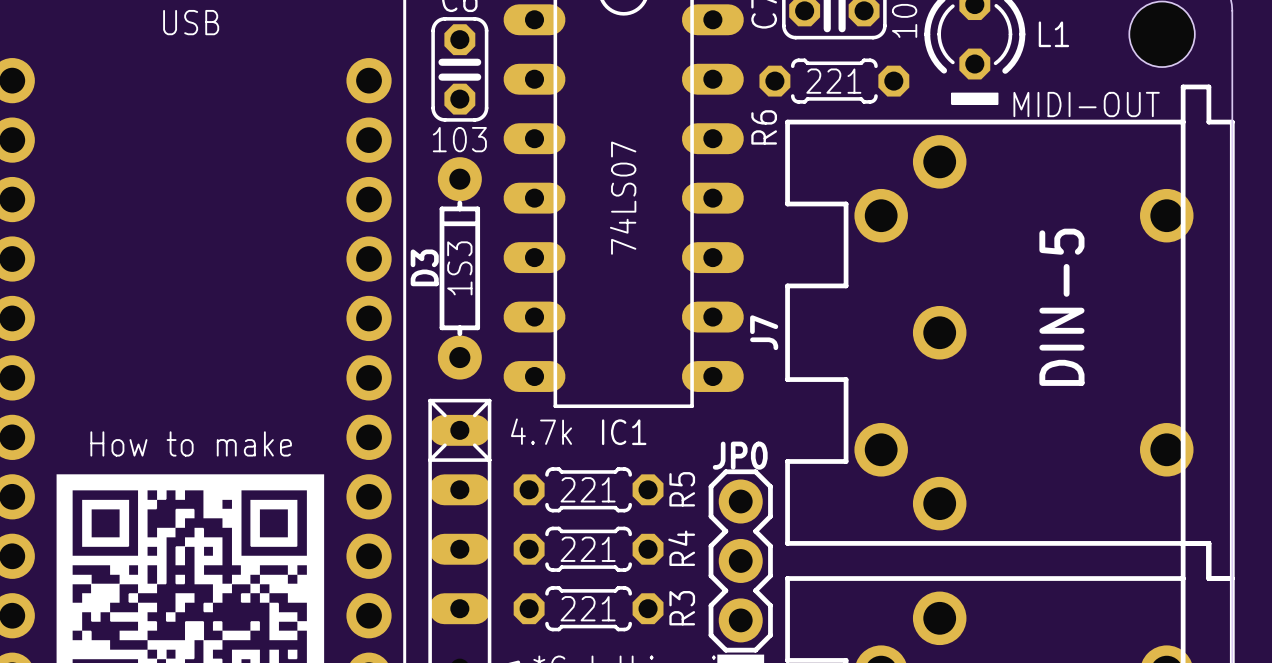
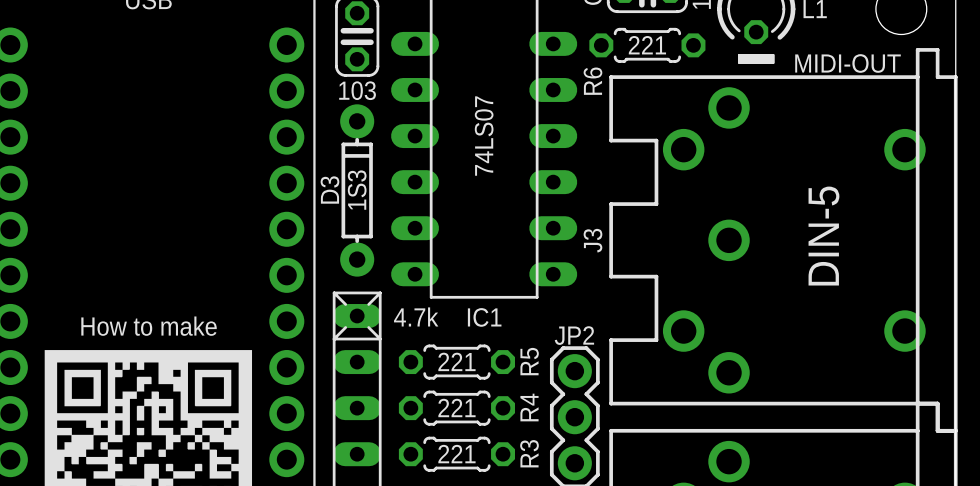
J7 name: J7 (764, 332) -> J3 (592, 240)
JP0 name: JP0 (740, 455) -> JP2 (574, 335)

